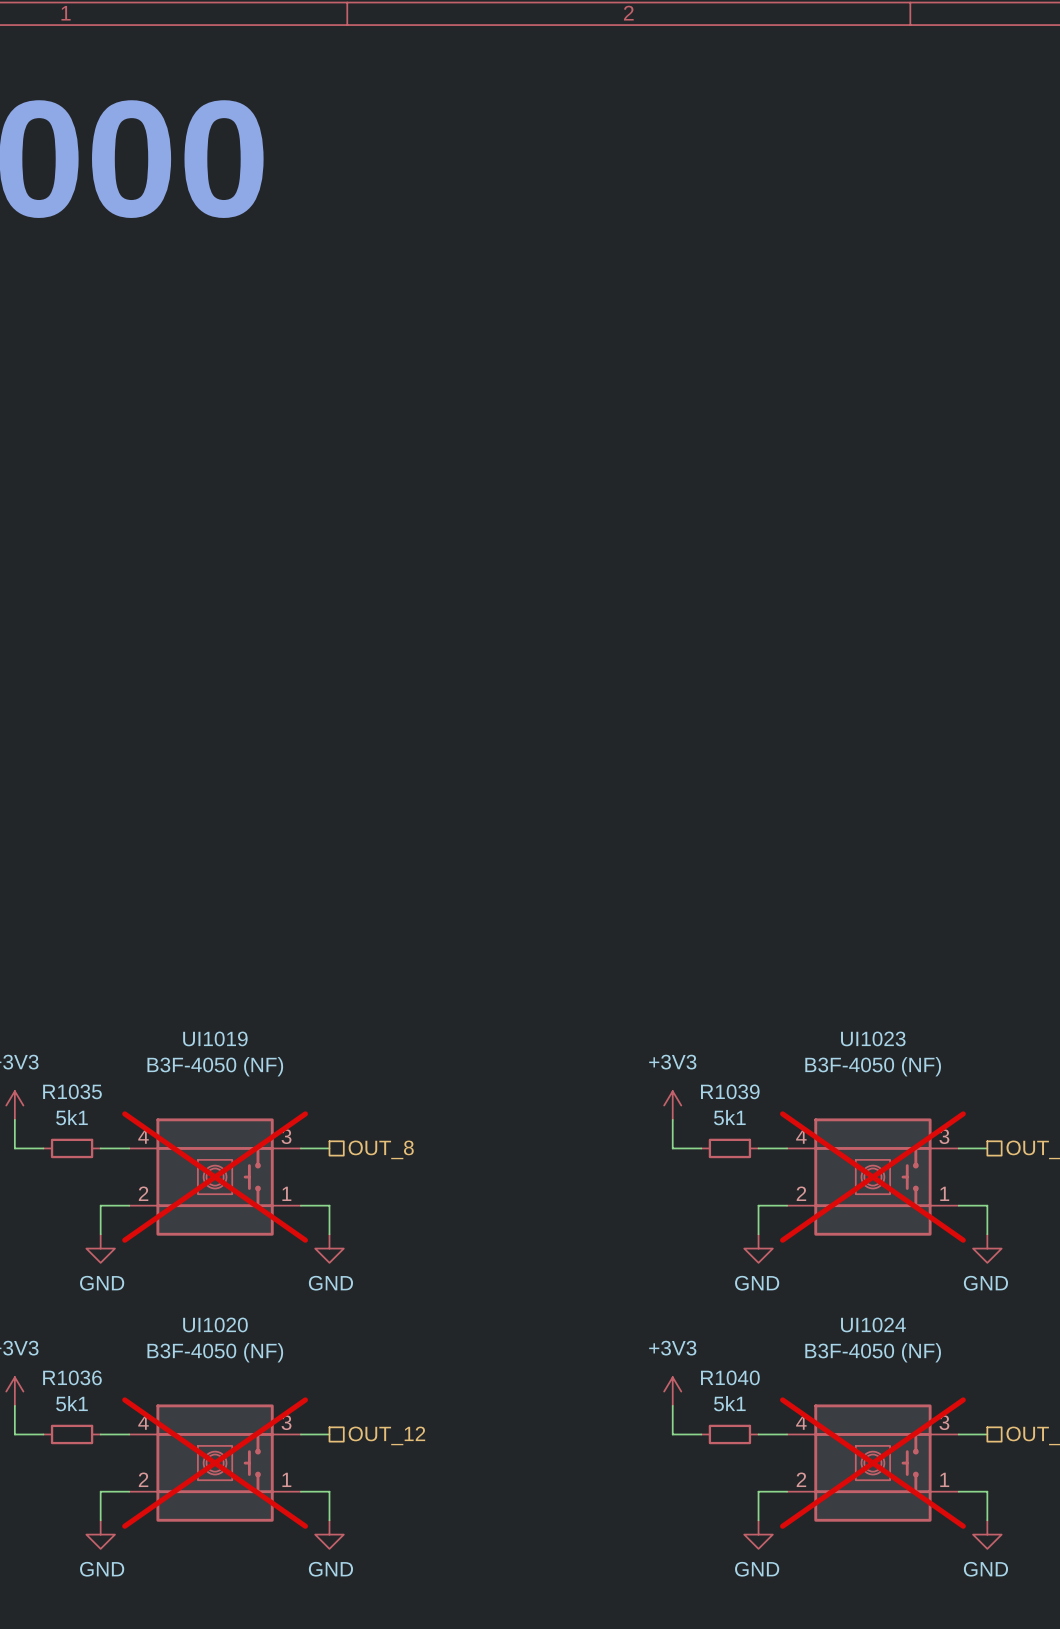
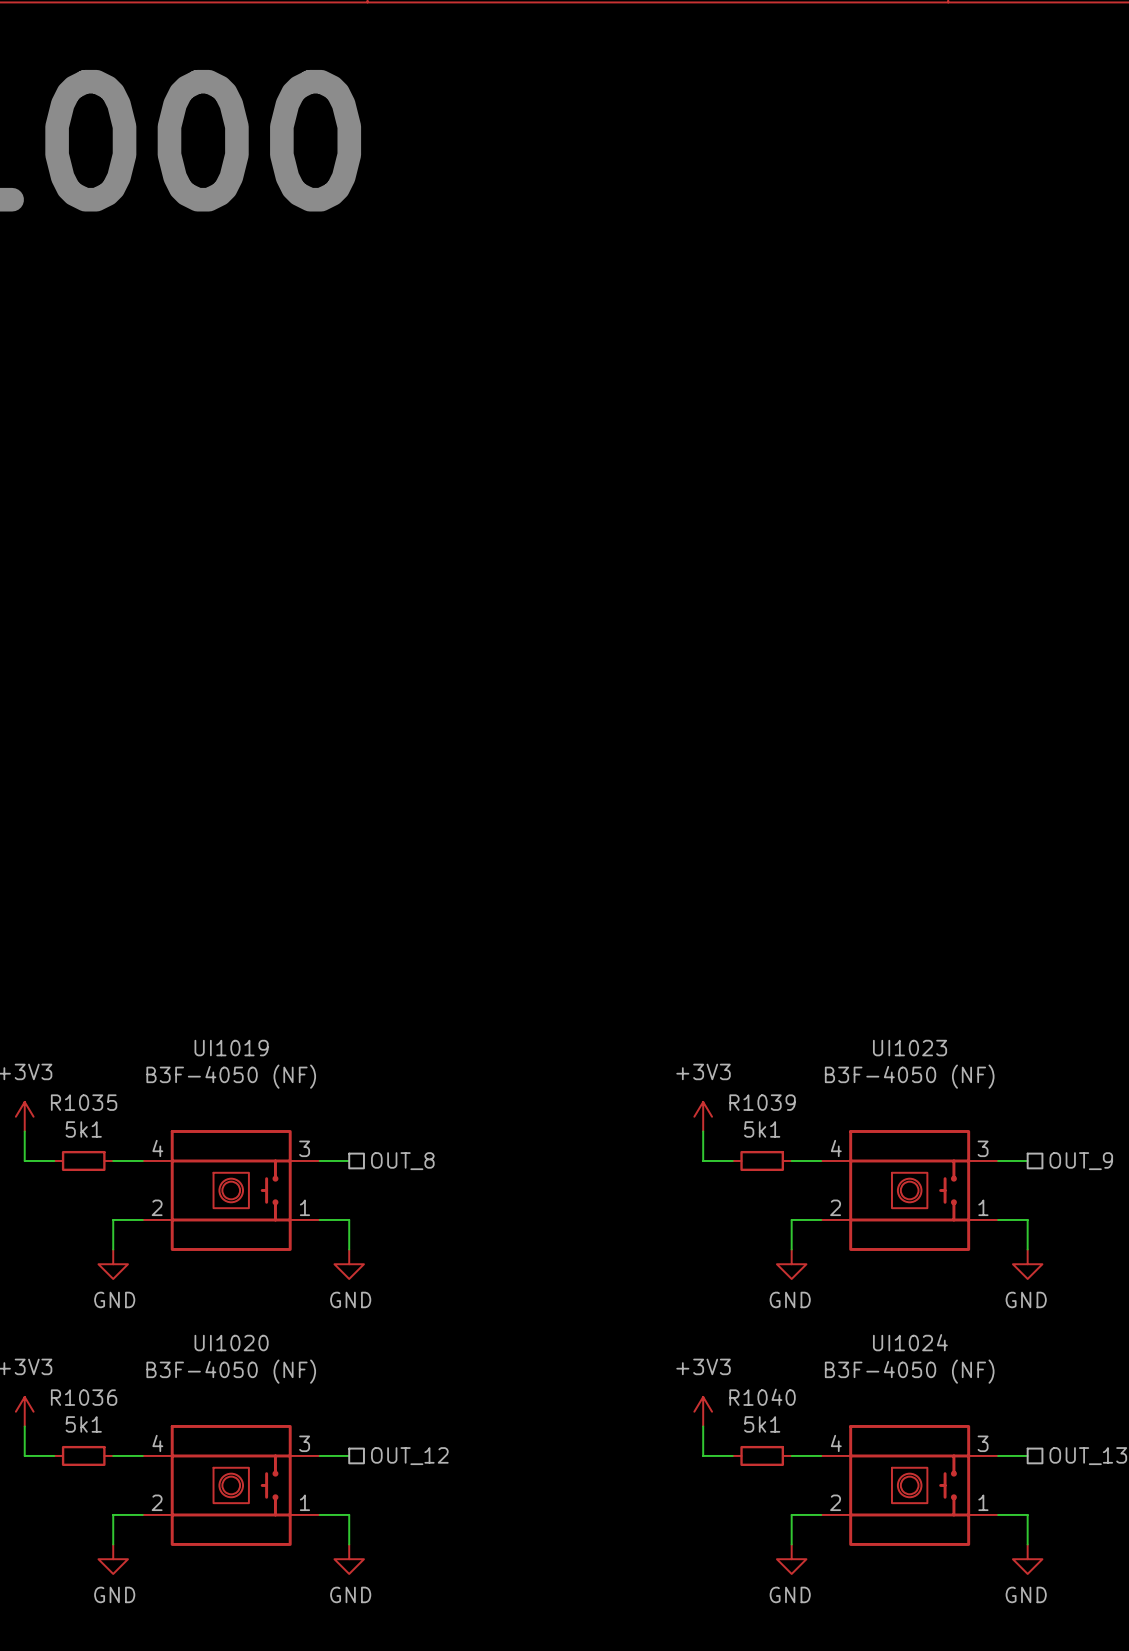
UI1019 do-not-place cross: (215, 1177) -> none
UI1023 do-not-place cross: (872, 1177) -> none
UI1020 do-not-place cross: (215, 1463) -> none
UI1024 do-not-place cross: (872, 1463) -> none

